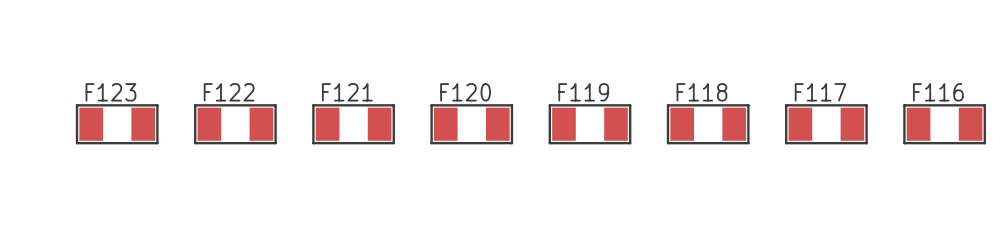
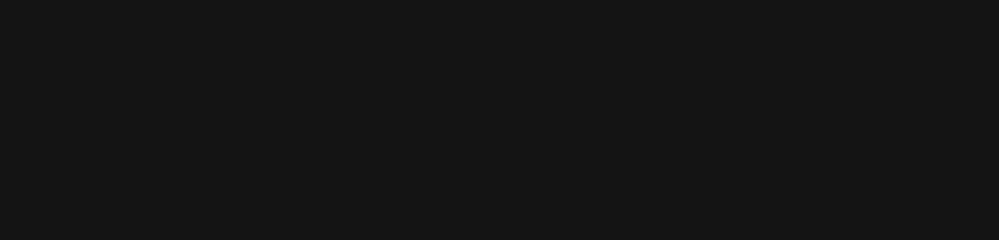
F123: (117, 124) -> none
F122: (235, 124) -> none
F121: (353, 124) -> none
F120: (471, 124) -> none
F119: (589, 124) -> none
F118: (708, 124) -> none
F117: (826, 124) -> none
F116: (944, 124) -> none

